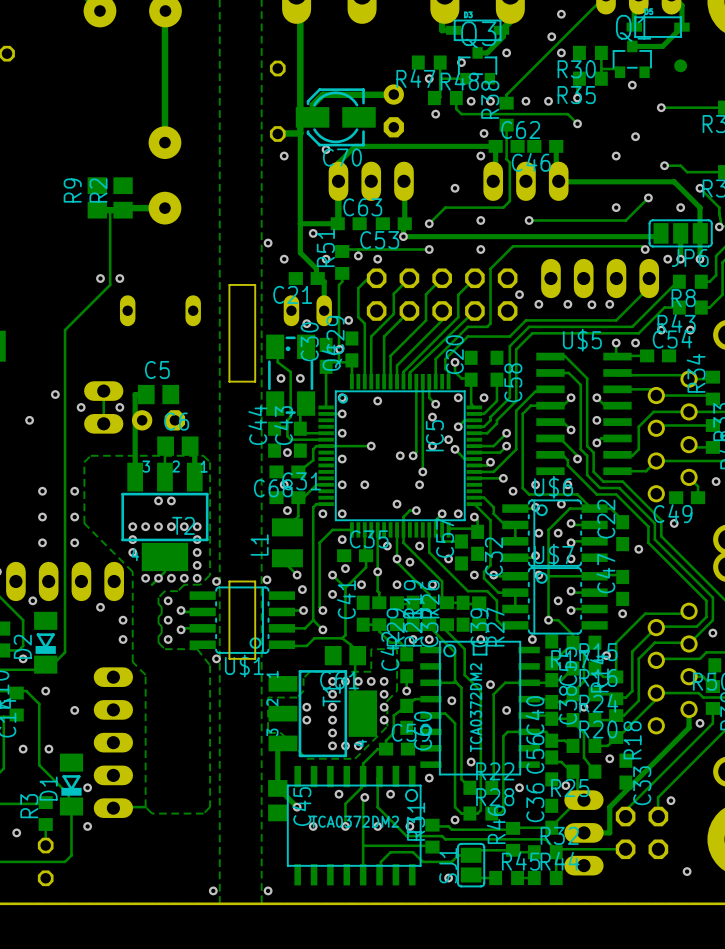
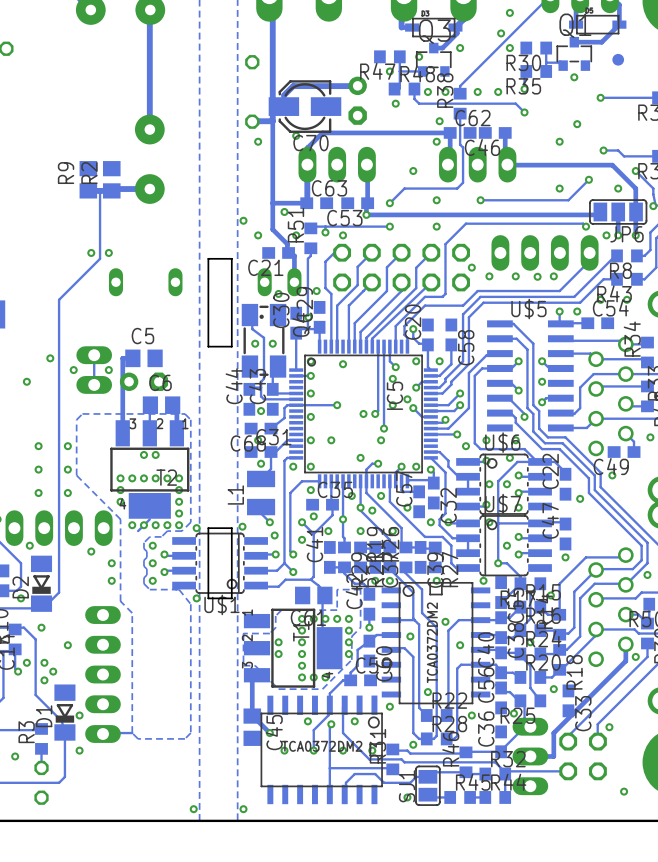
track: none -> (15, 649) (15, 668) (18, 671)
via: none -> (26, 662)
via: none -> (44, 662)
via: none -> (18, 671)
via: none -> (53, 671)
via: (23, 749) -> none

